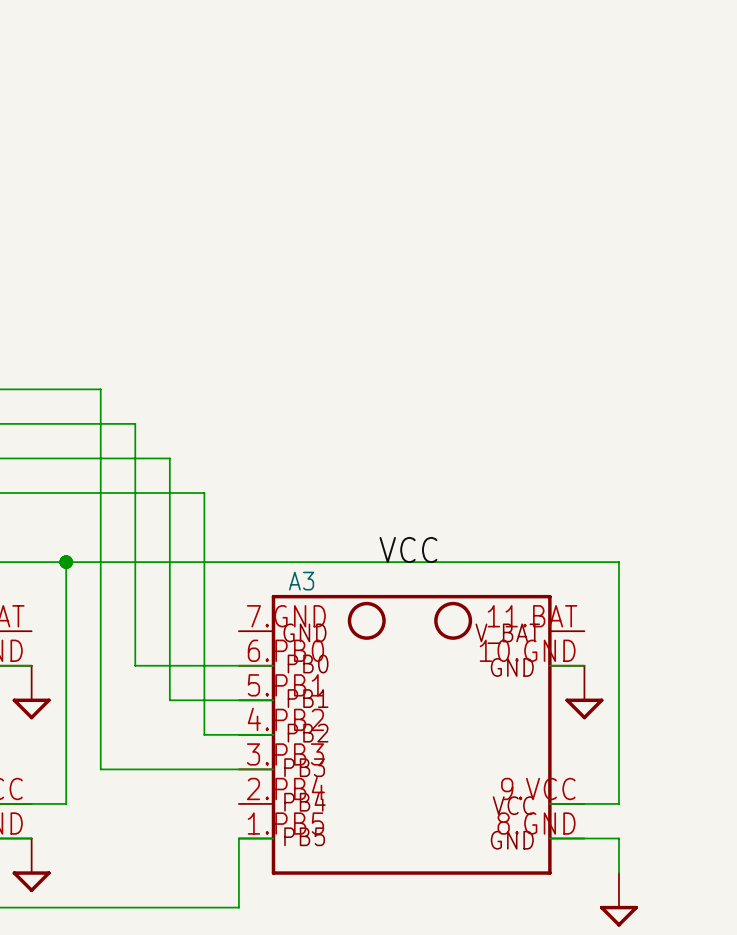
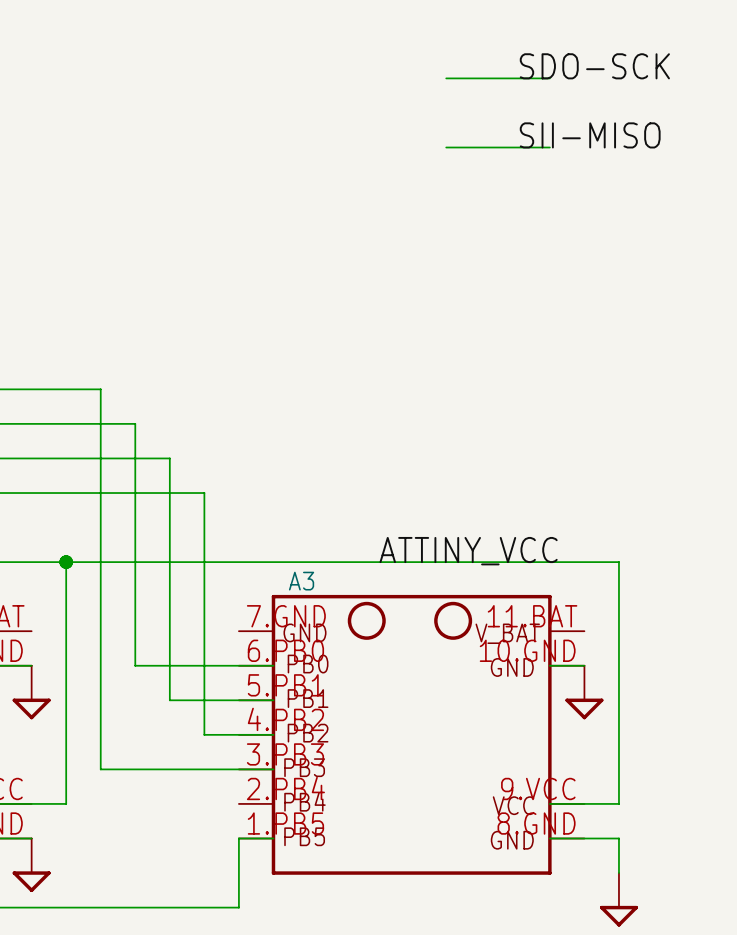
label: none -> SDO-SCK (594, 66)
wire: none -> (446, 78) (549, 78)
label: none -> SII-MISO (590, 135)
wire: none -> (446, 147) (549, 147)
label: VCC (408, 550) -> ATTINY_VCC (468, 551)

